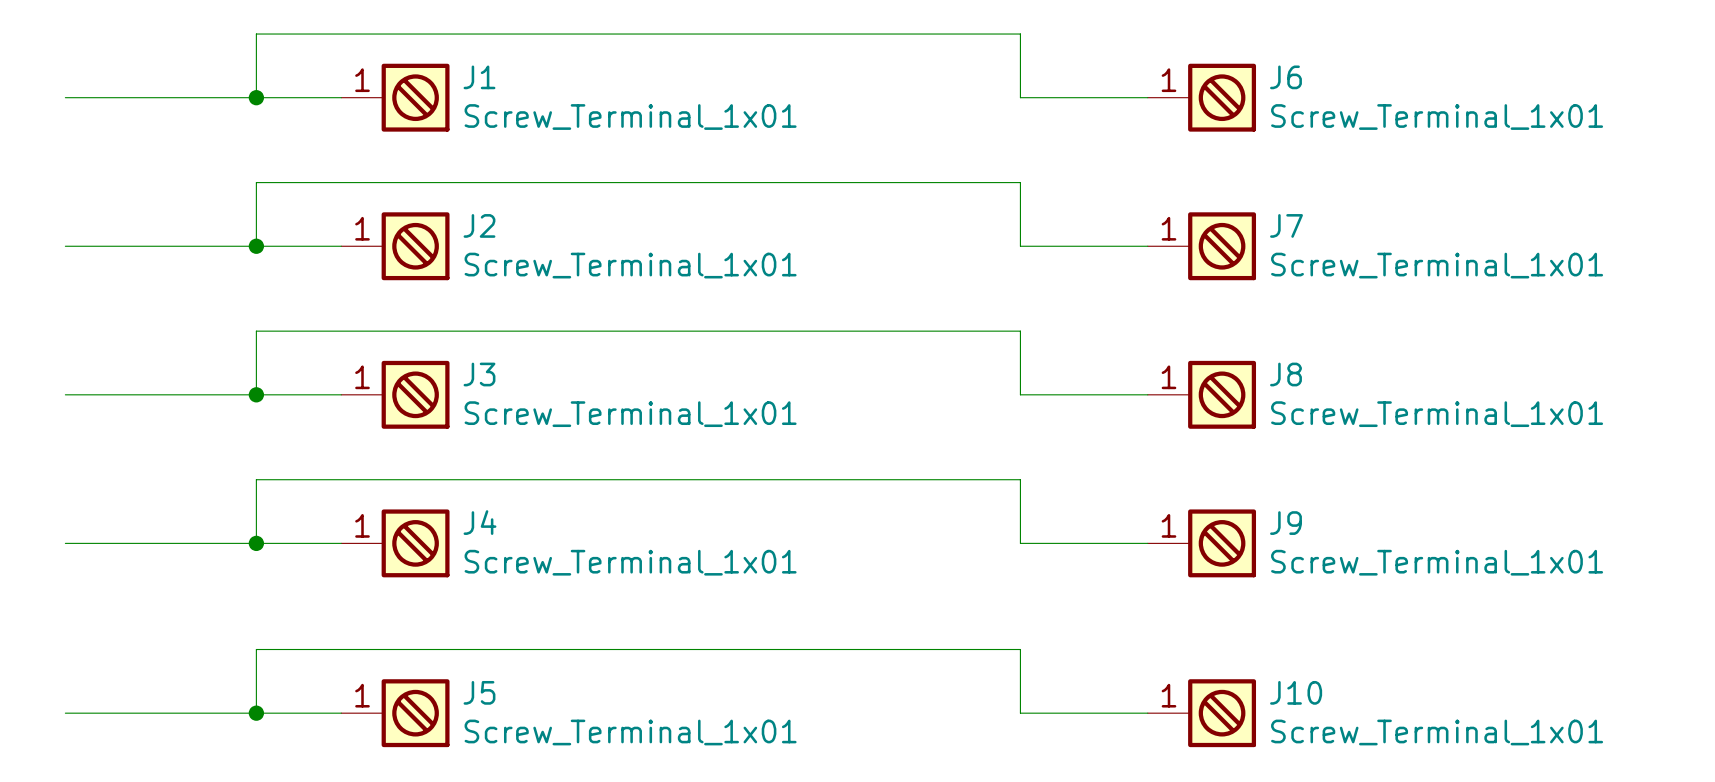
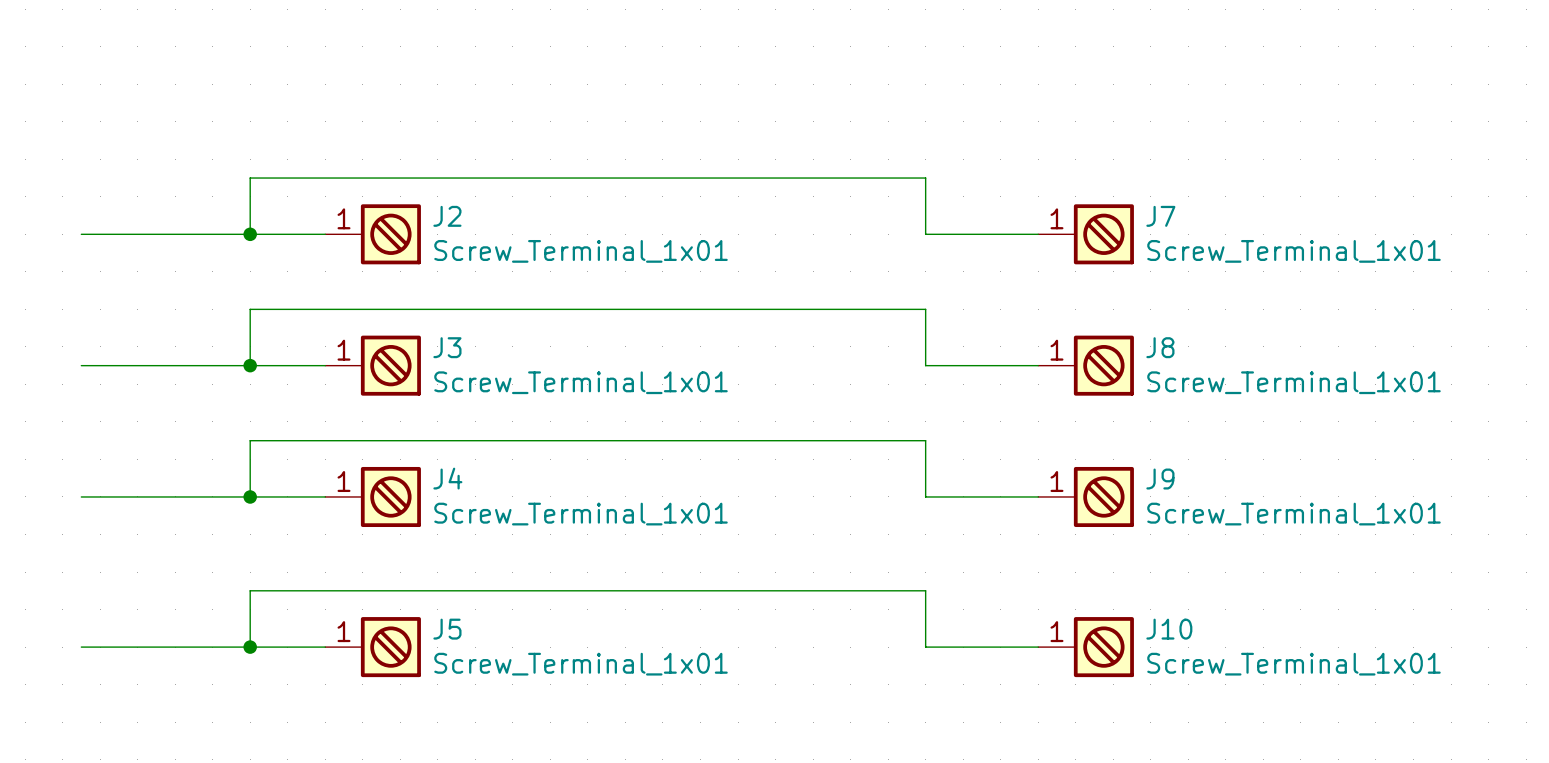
wire: (65, 97) (341, 97) -> none
wire: (256, 97) (256, 34) (1020, 34) (1020, 97) (1147, 97) -> none
junction: (256, 97) -> none
J1: Screw_Terminal_1x01 (395, 97) -> none
J6: Screw_Terminal_1x01 (1201, 97) -> none

